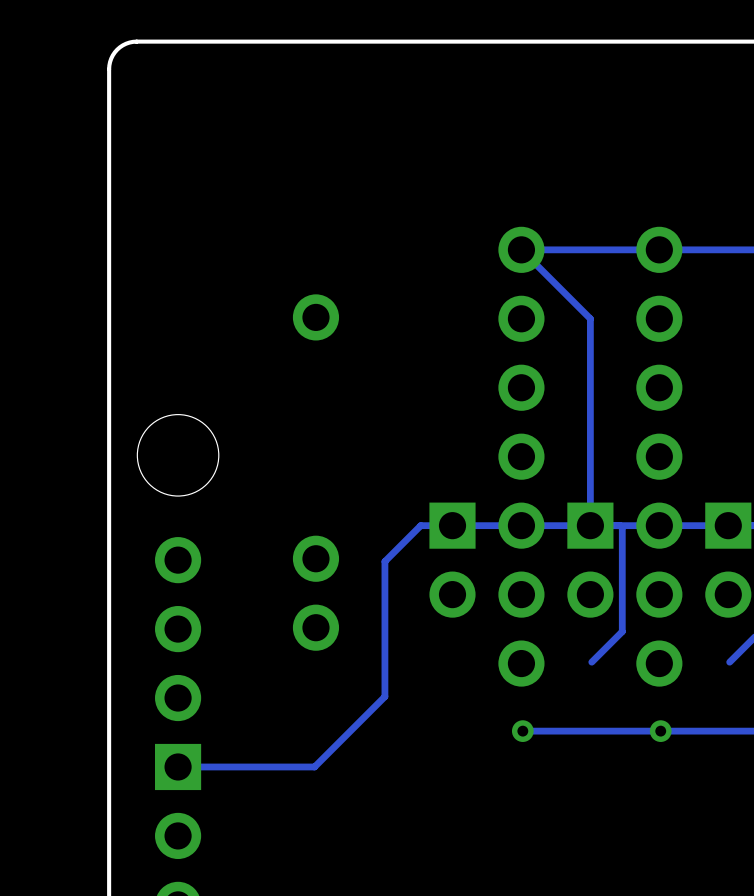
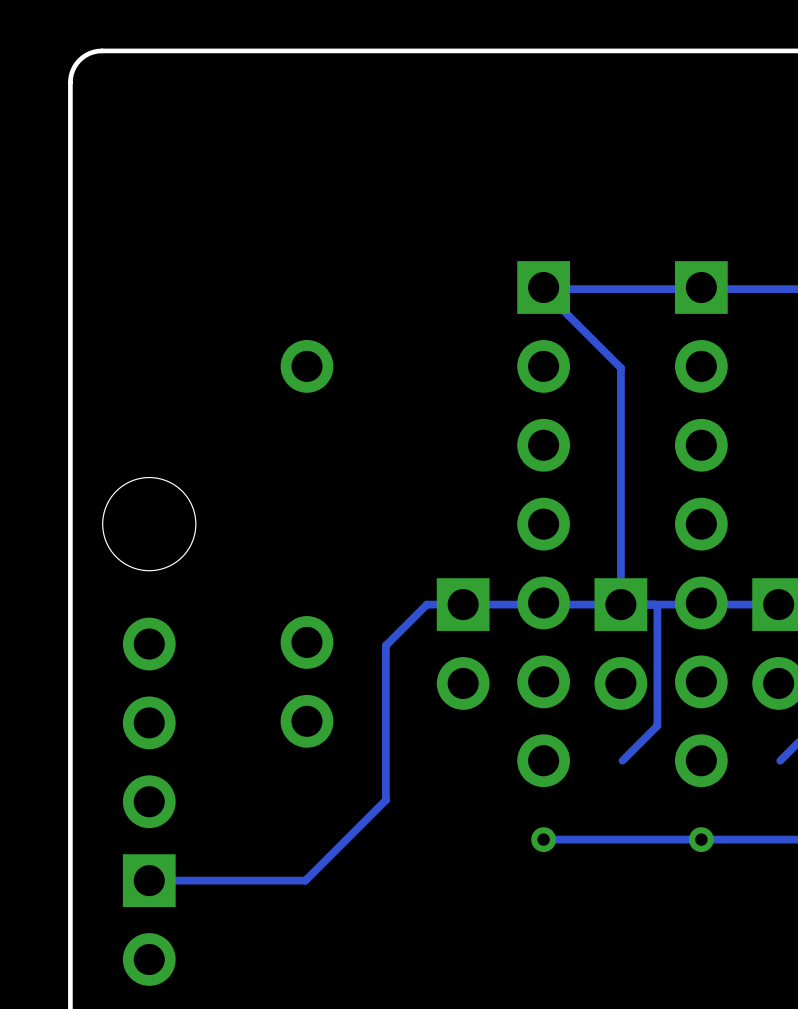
part: (521, 318) -> none
part: (659, 318) -> none
part: none -> (543, 524)
part: none -> (701, 524)
part: (521, 560) -> none
part: (659, 560) -> none

